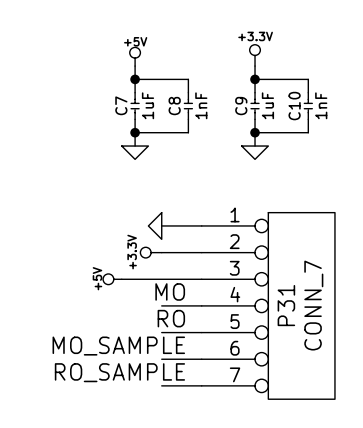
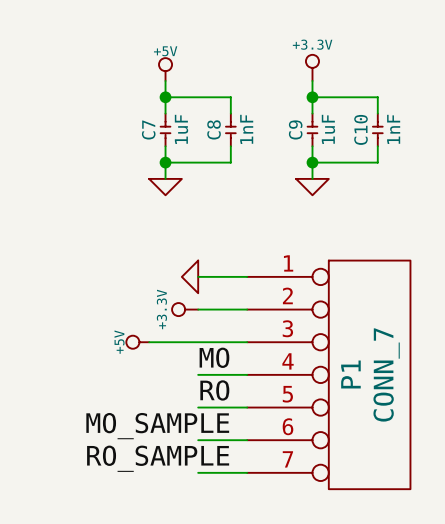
P31 name: P31 (286, 305) -> P1 (350, 374)

